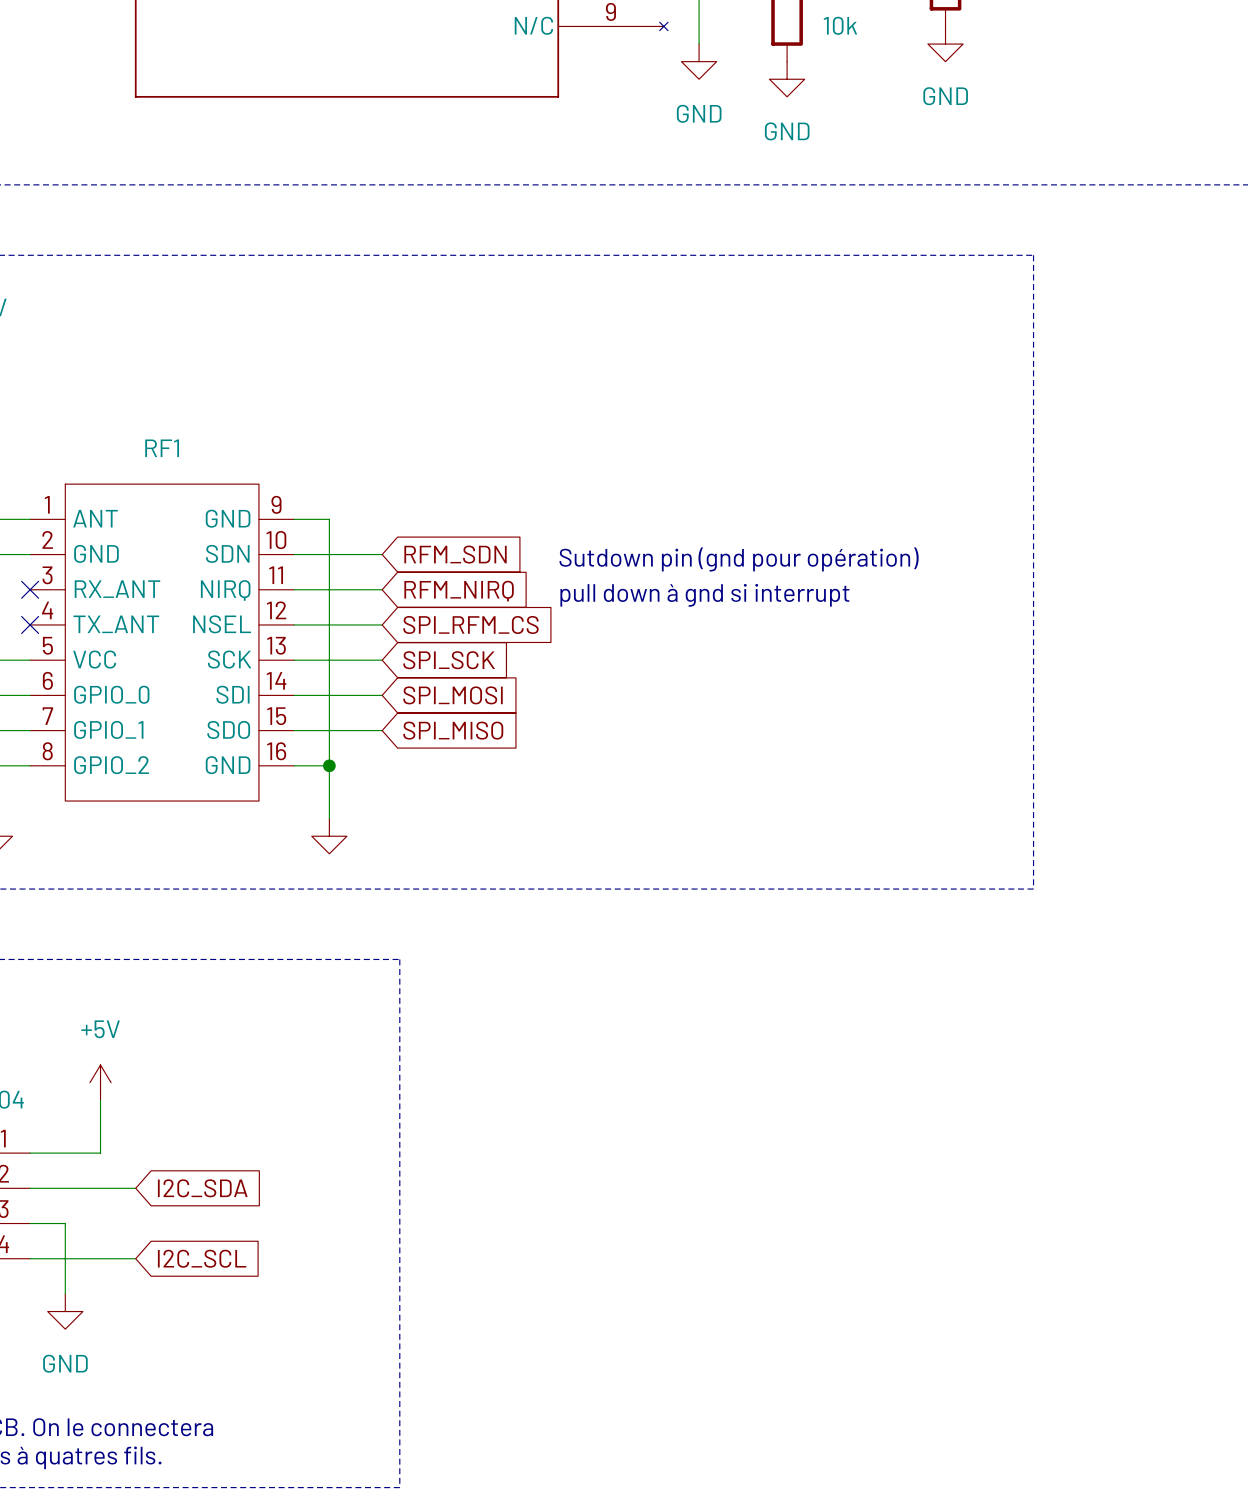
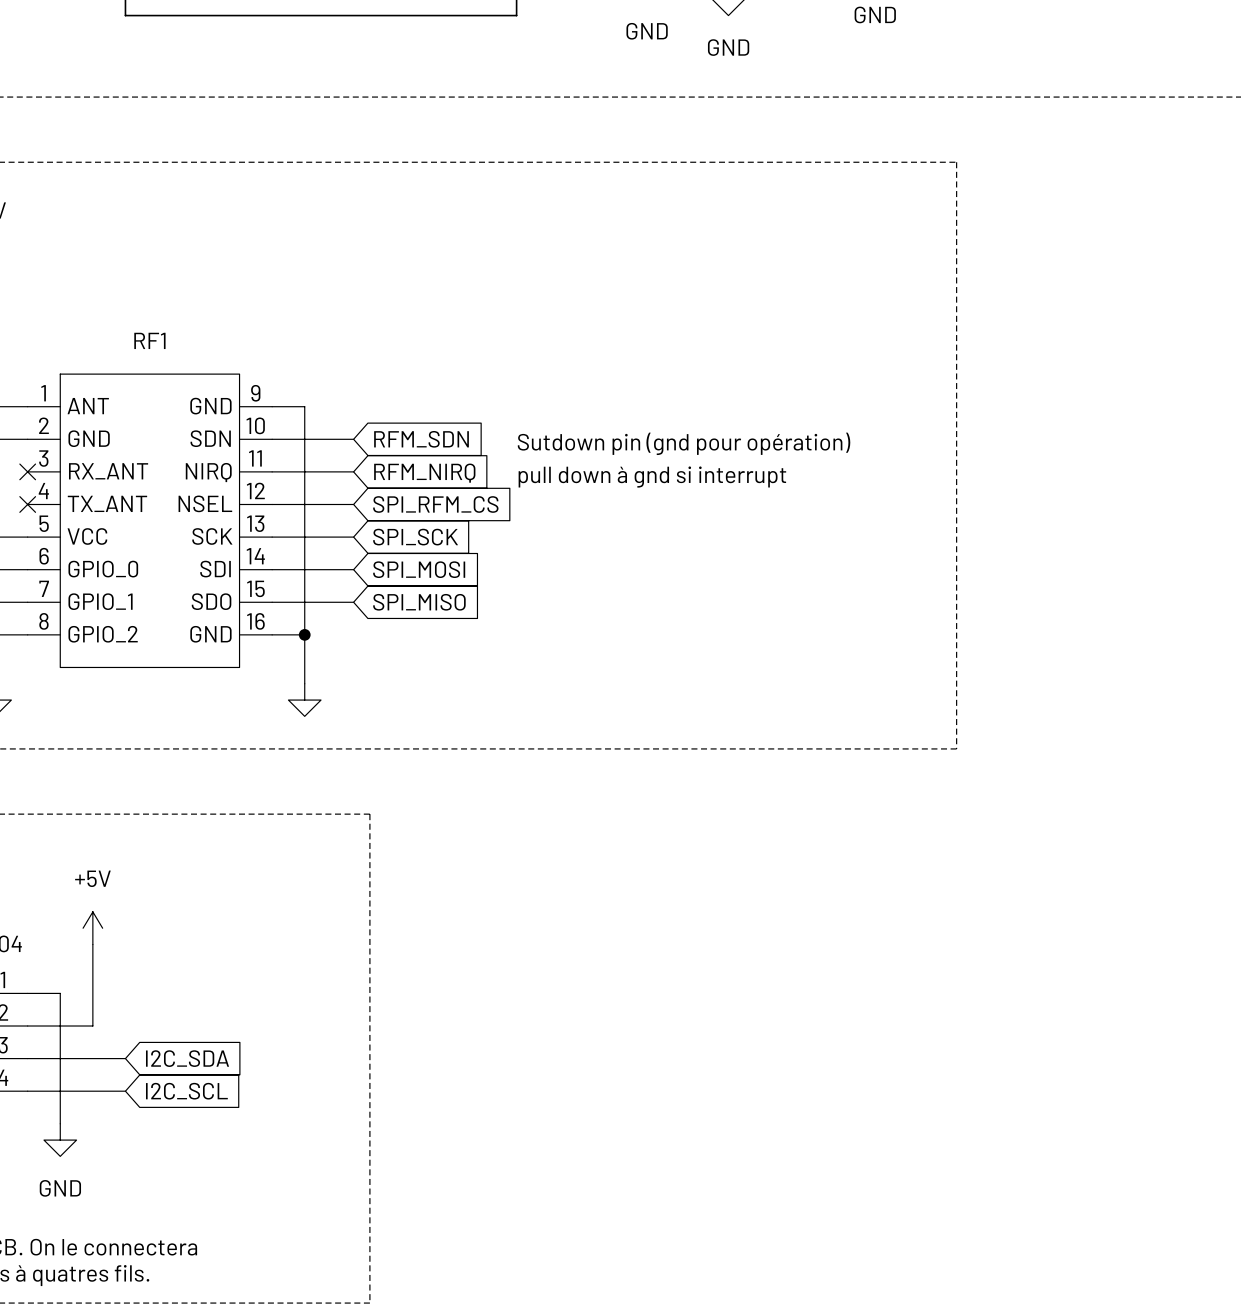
wire: (65, 1153) (100, 1153) -> (92, 1026) (92, 993)
wire: none -> (60, 993) (60, 1058) (125, 1058)
wire: (100, 1188) (135, 1188) -> none
global label position: I2C_SDA (202, 1188) -> I2C_SDA (187, 1058)

